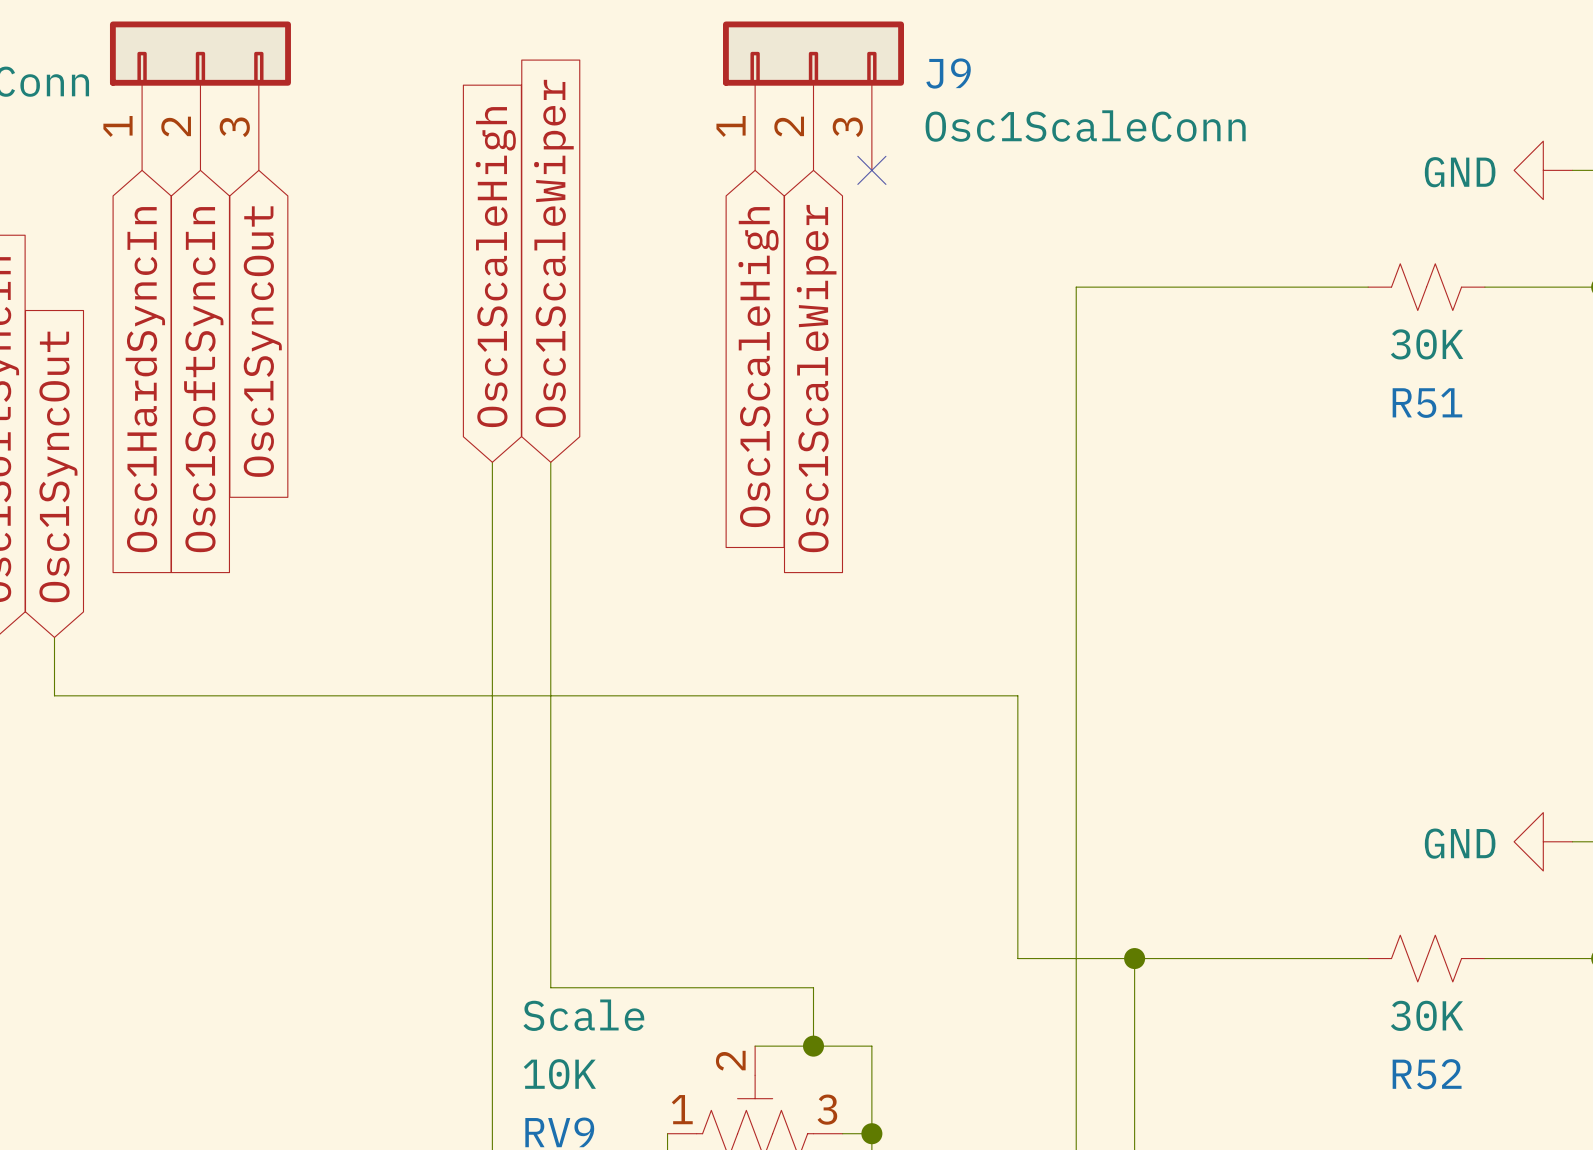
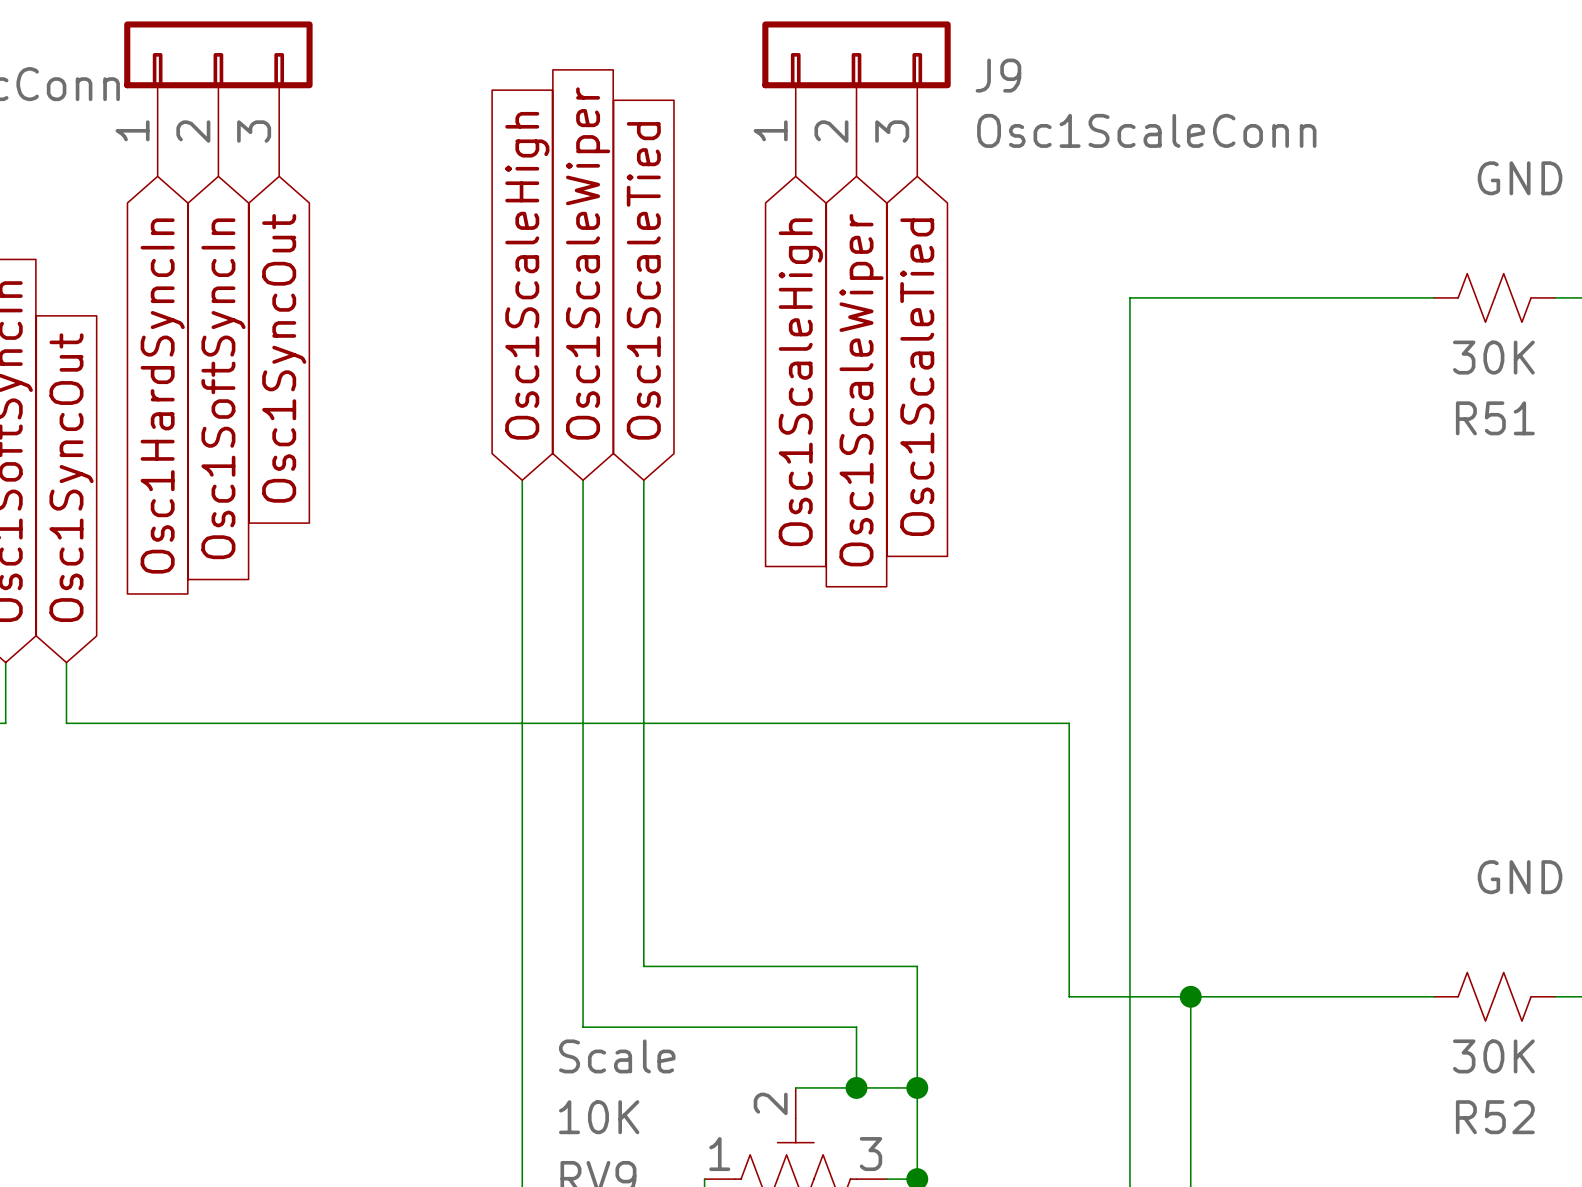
no-connect mark: (871, 170) -> none
global label: none -> Osc1ScaleTied (643, 280)
global label: none -> Osc1ScaleTied (917, 377)
wire: none -> (643, 480) (643, 966) (917, 966) (917, 1087)
junction: none -> (917, 1087)

